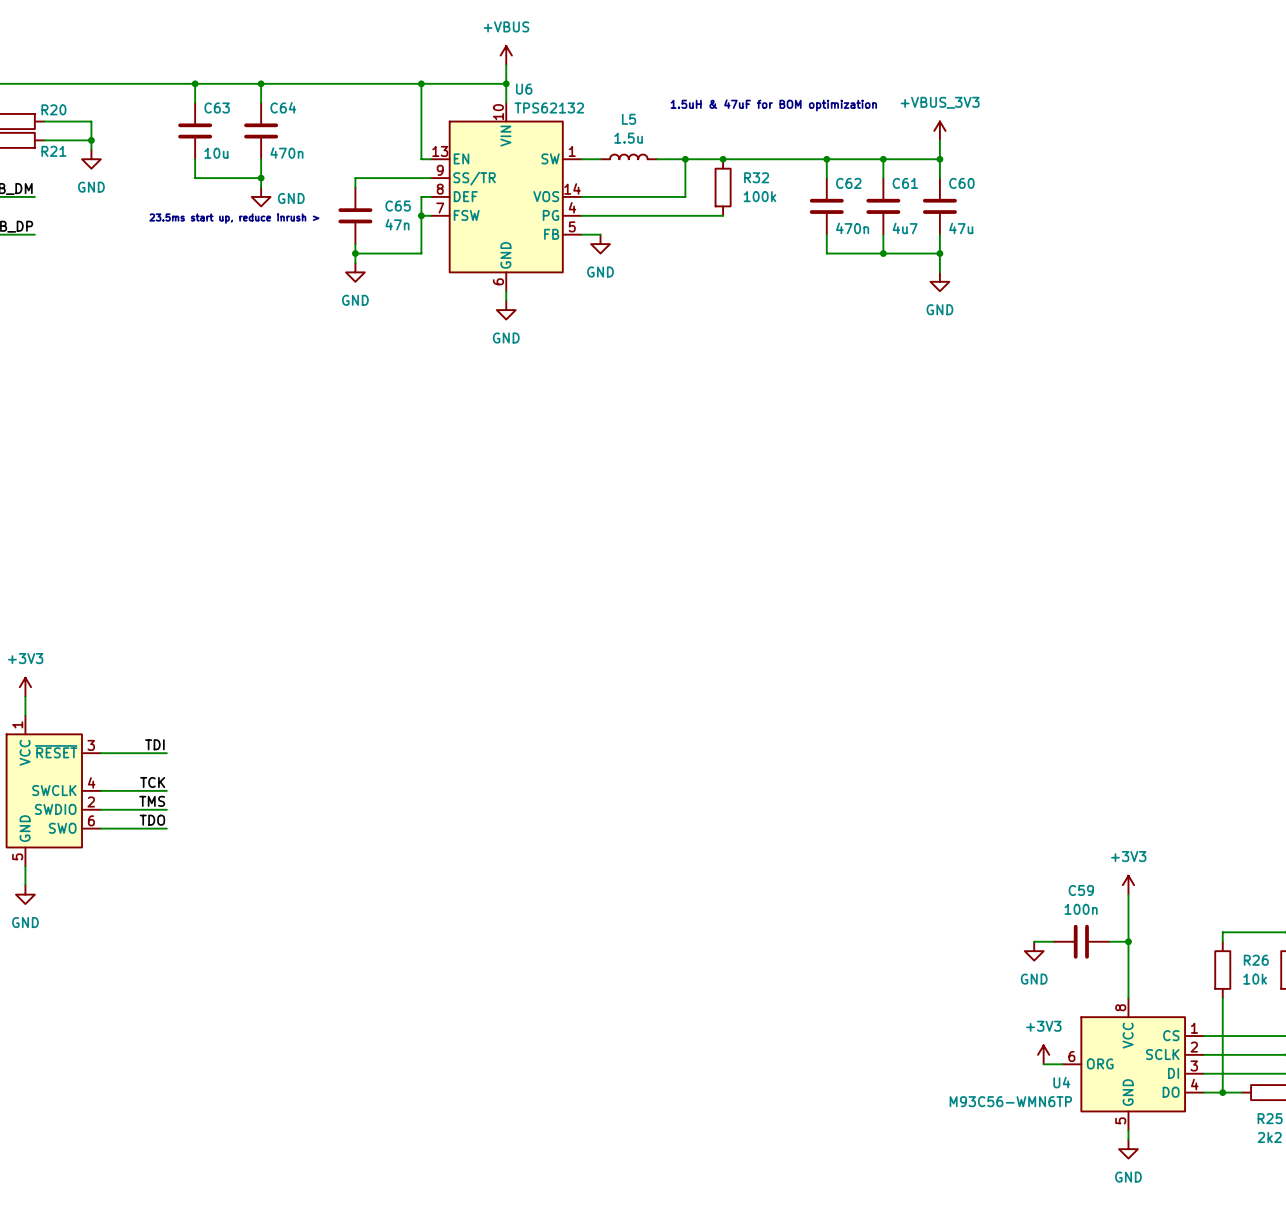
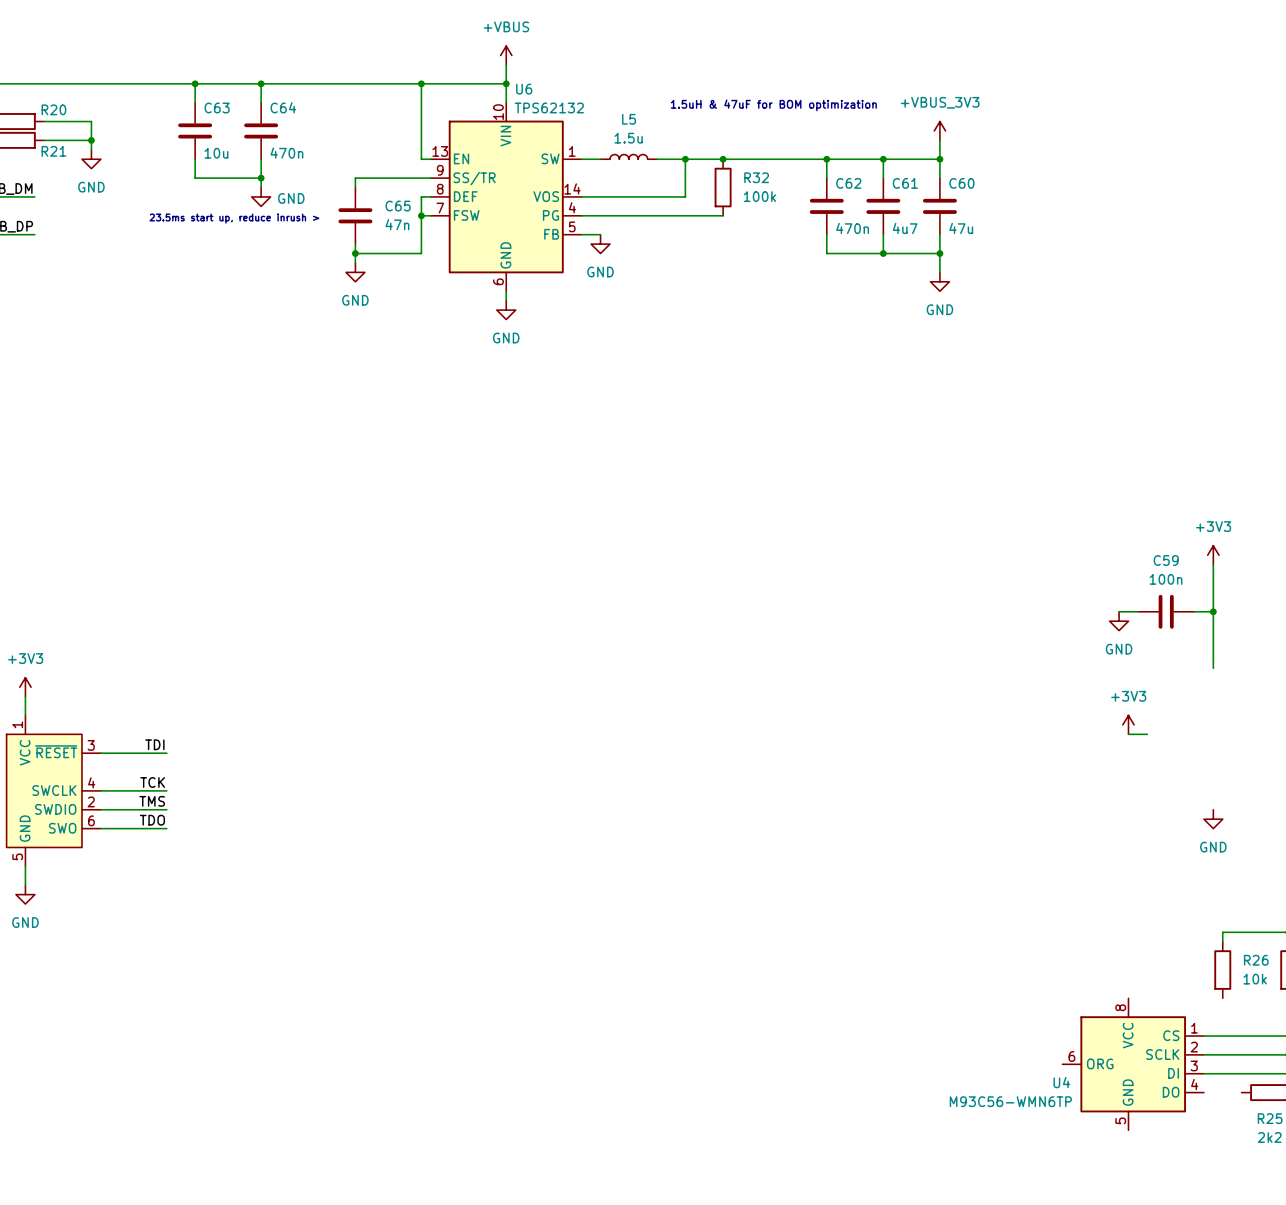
power symbol: none -> +3V3 (1213, 555)
wire: none -> (1213, 564) (1213, 668)
wire: none -> (1119, 611) (1137, 611)
wire: none -> (1194, 611) (1213, 611)
junction: none -> (1213, 611)
power symbol: none -> GND (1119, 621)
power symbol: none -> +3V3 (1128, 724)
wire: none -> (1128, 734) (1147, 734)
power symbol: none -> GND (1213, 819)
power symbol: +3V3 (1128, 885) -> none
wire: (1128, 894) (1128, 998) -> none
wire: (1034, 941) (1053, 941) -> none
C59 position: (1081, 941) -> (1166, 611)
wire: (1109, 941) (1128, 941) -> none
junction: (1128, 941) -> none
power symbol: GND (1034, 951) -> none
wire: (1222, 998) (1222, 1092) -> none
power symbol: +3V3 (1043, 1054) -> none
wire: (1043, 1064) (1062, 1064) -> none
wire: (1203, 1092) (1241, 1092) -> none
junction: (1222, 1092) -> none
wire: (1128, 1130) (1128, 1139) -> none
power symbol: GND (1128, 1149) -> none

